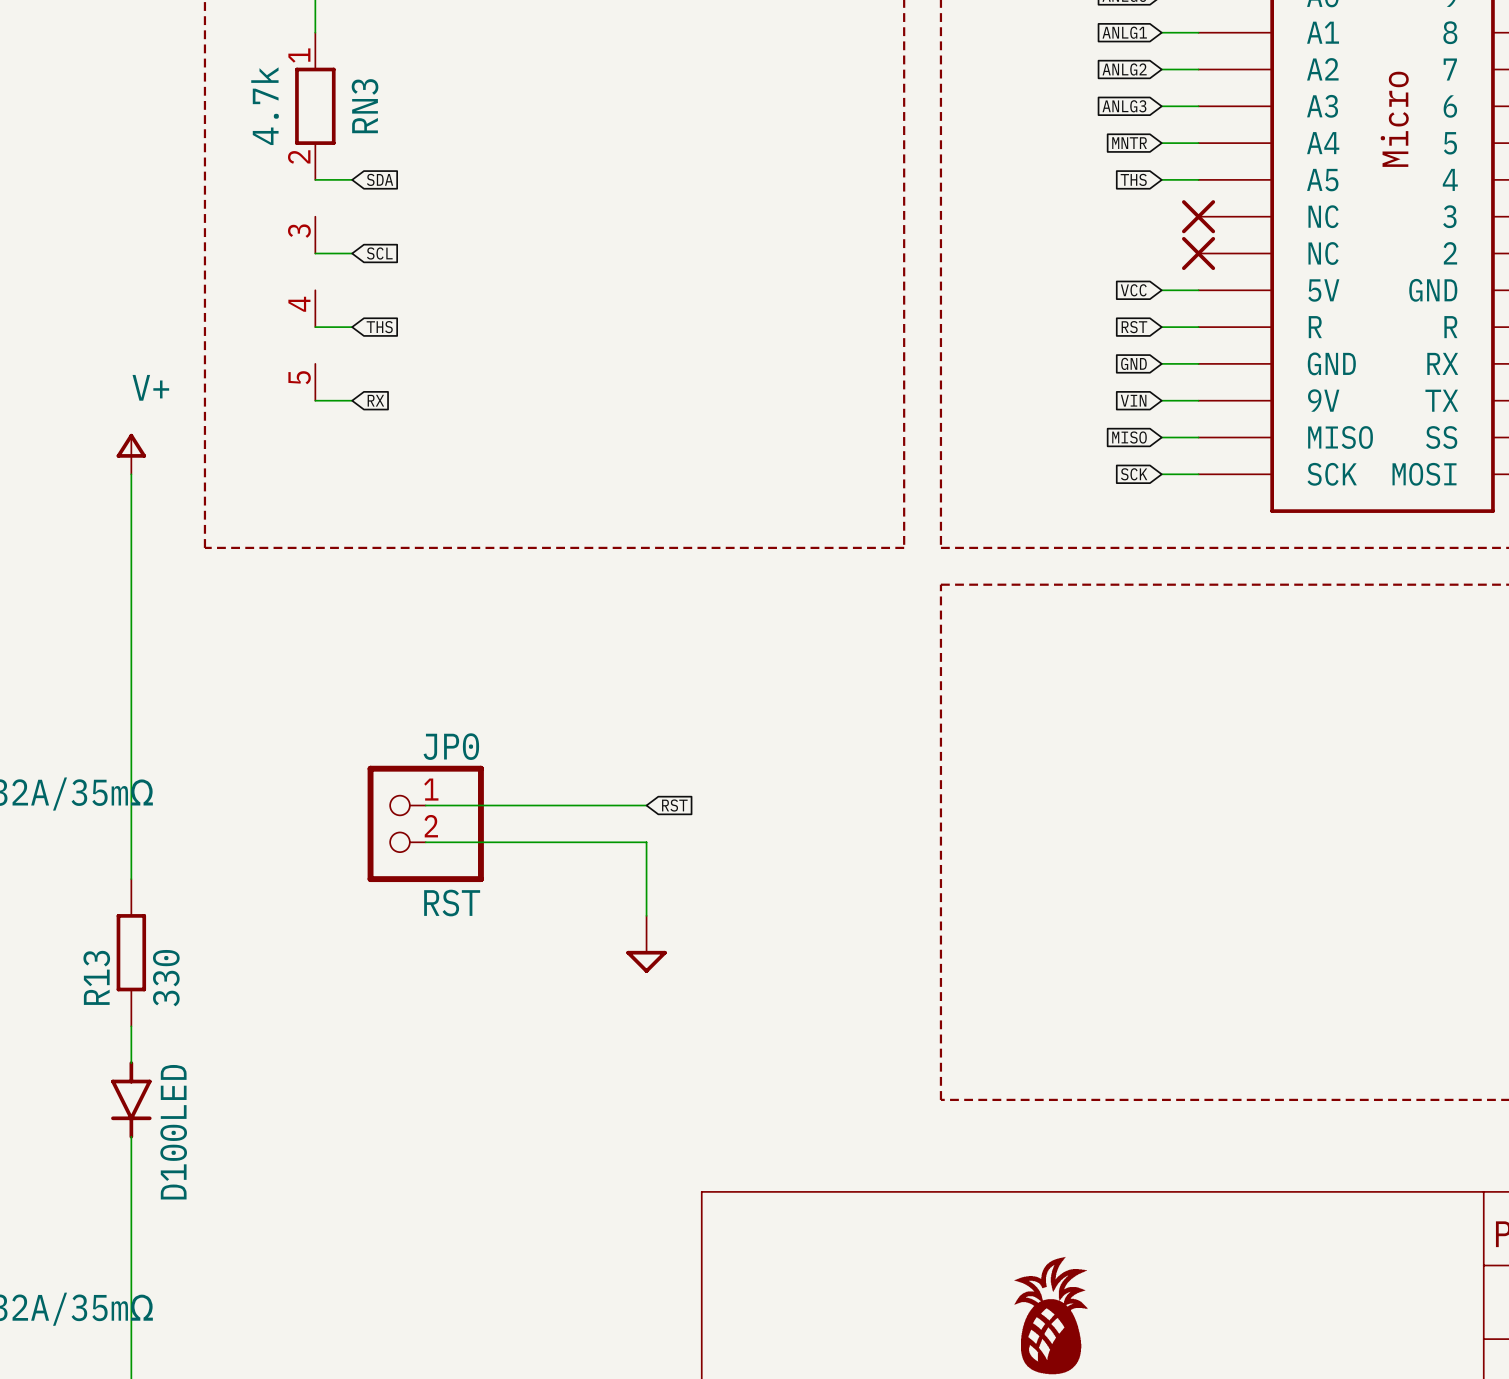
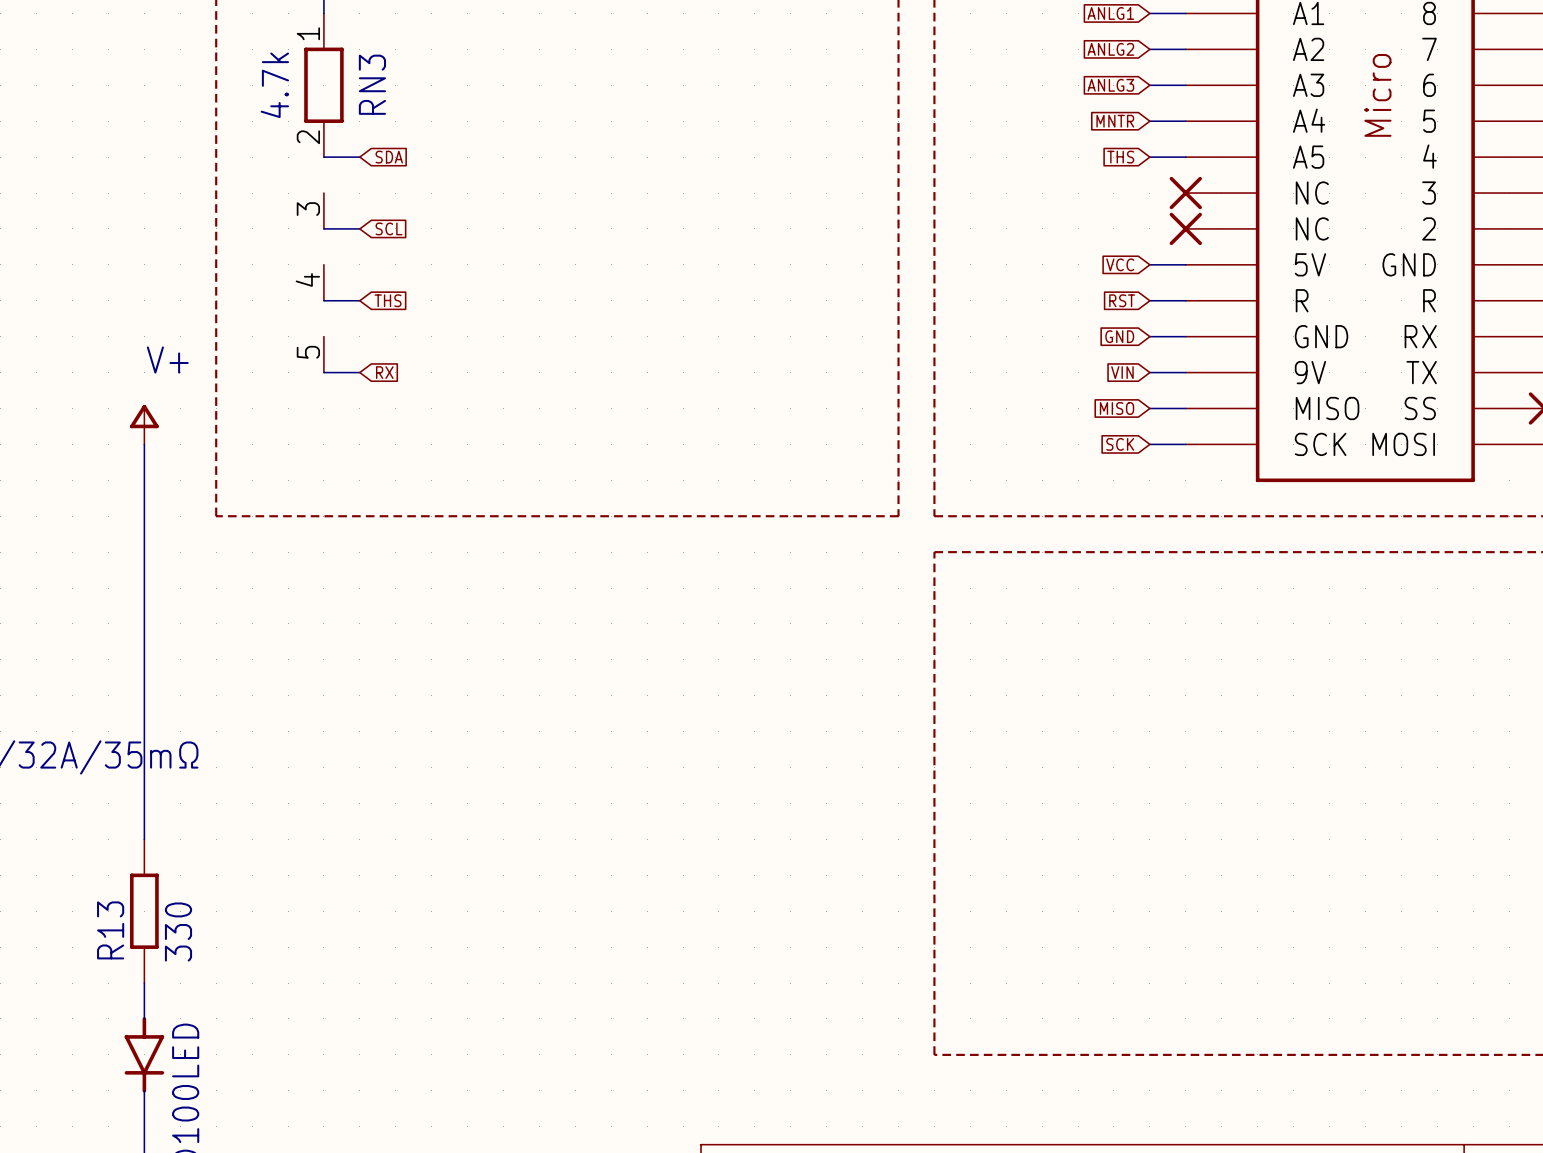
wire: (425, 805) (646, 805) -> none
global label: RST (674, 805) -> none
JP0: RST (425, 823) -> none
wire: (425, 842) (646, 842) (646, 915) -> none
power symbol: (646, 944) -> none

